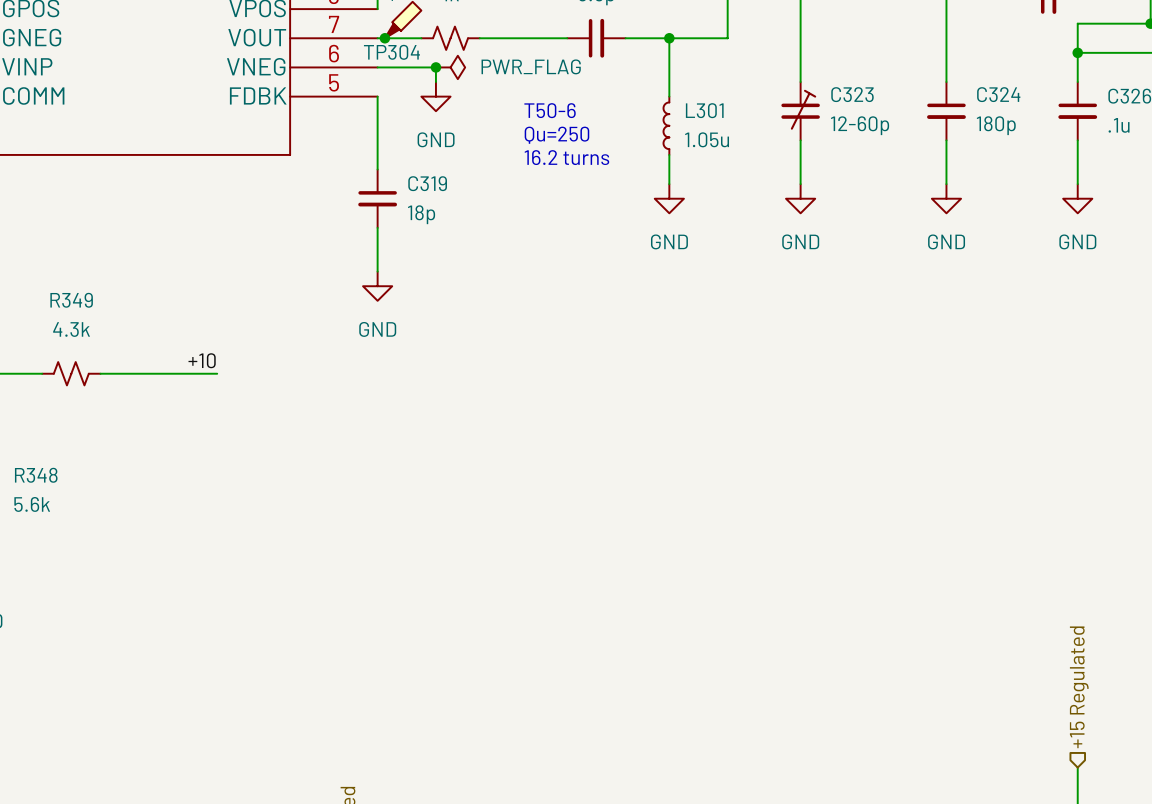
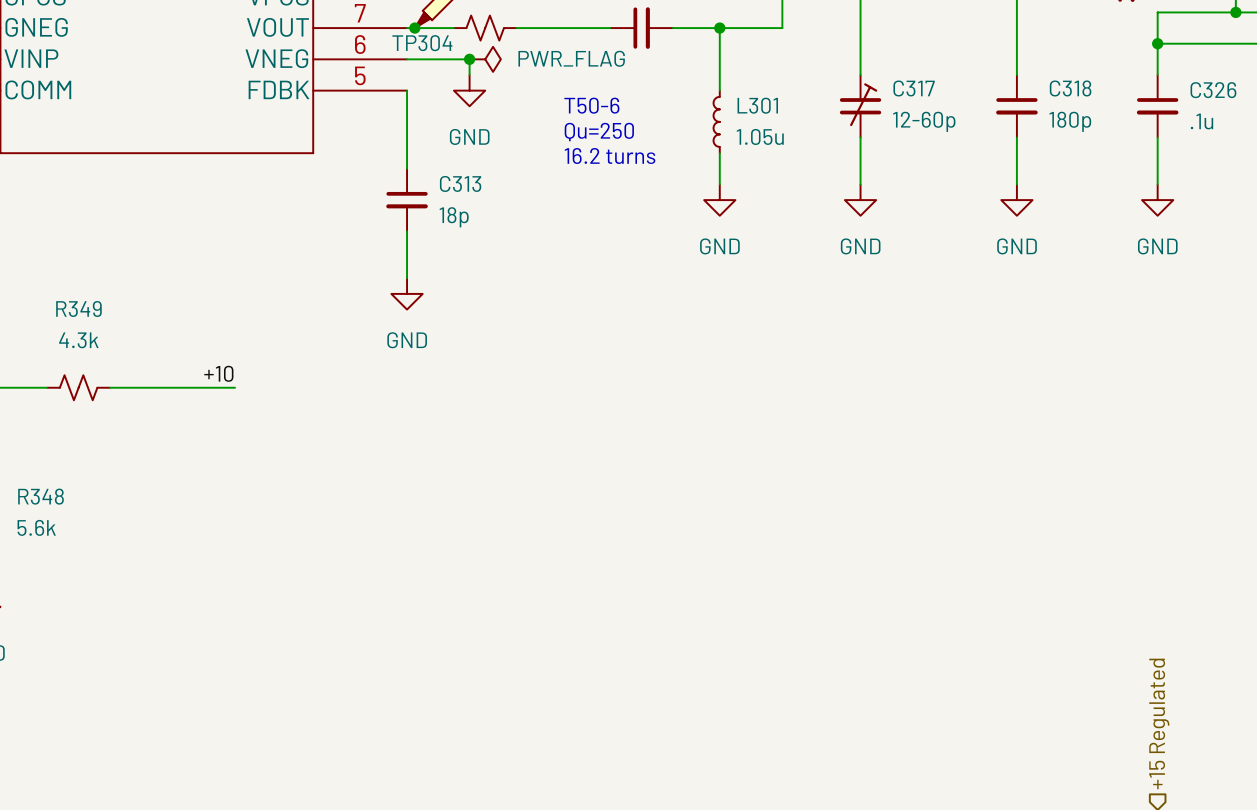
C323 name: C323 (852, 94) -> C317 (914, 88)
C324 name: C324 (998, 94) -> C318 (1070, 88)
C319 name: C319 (427, 183) -> C313 (460, 183)

